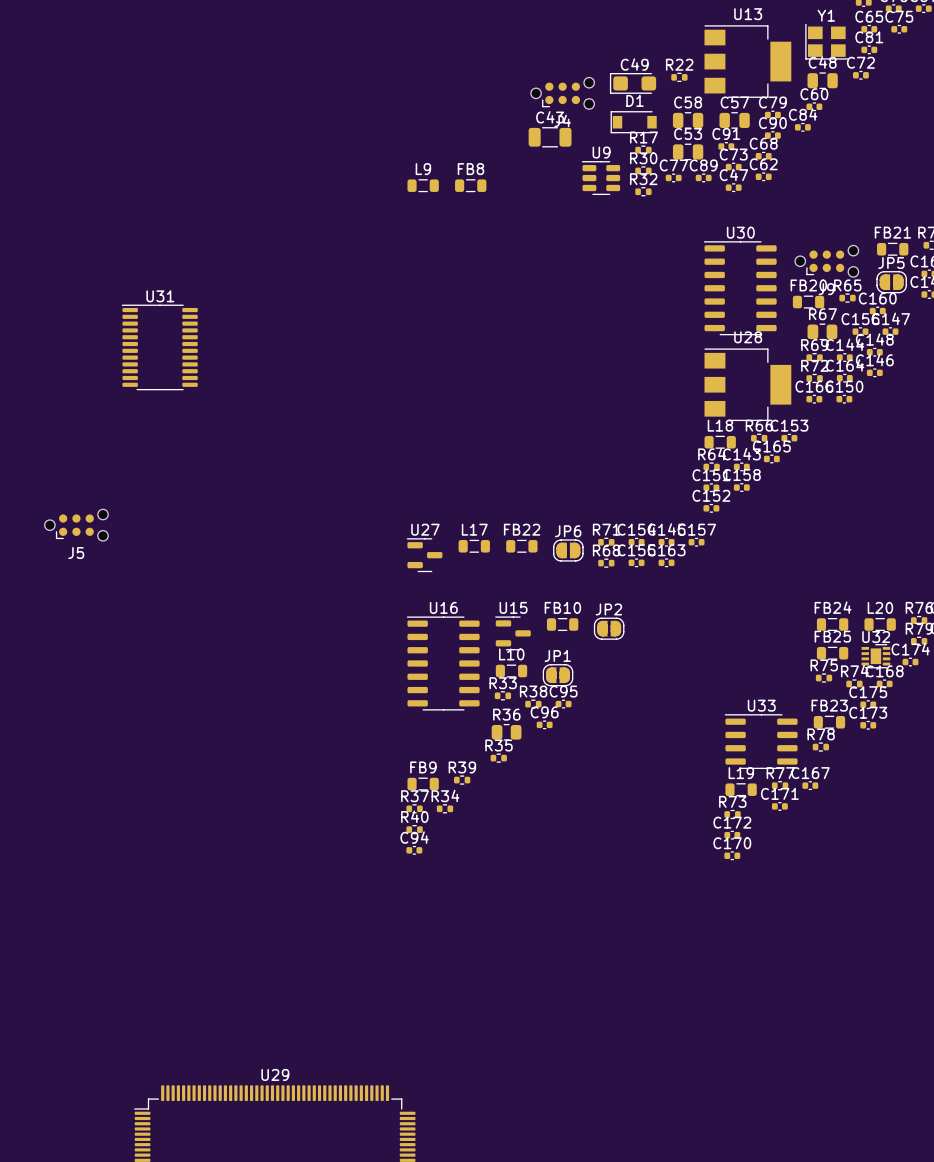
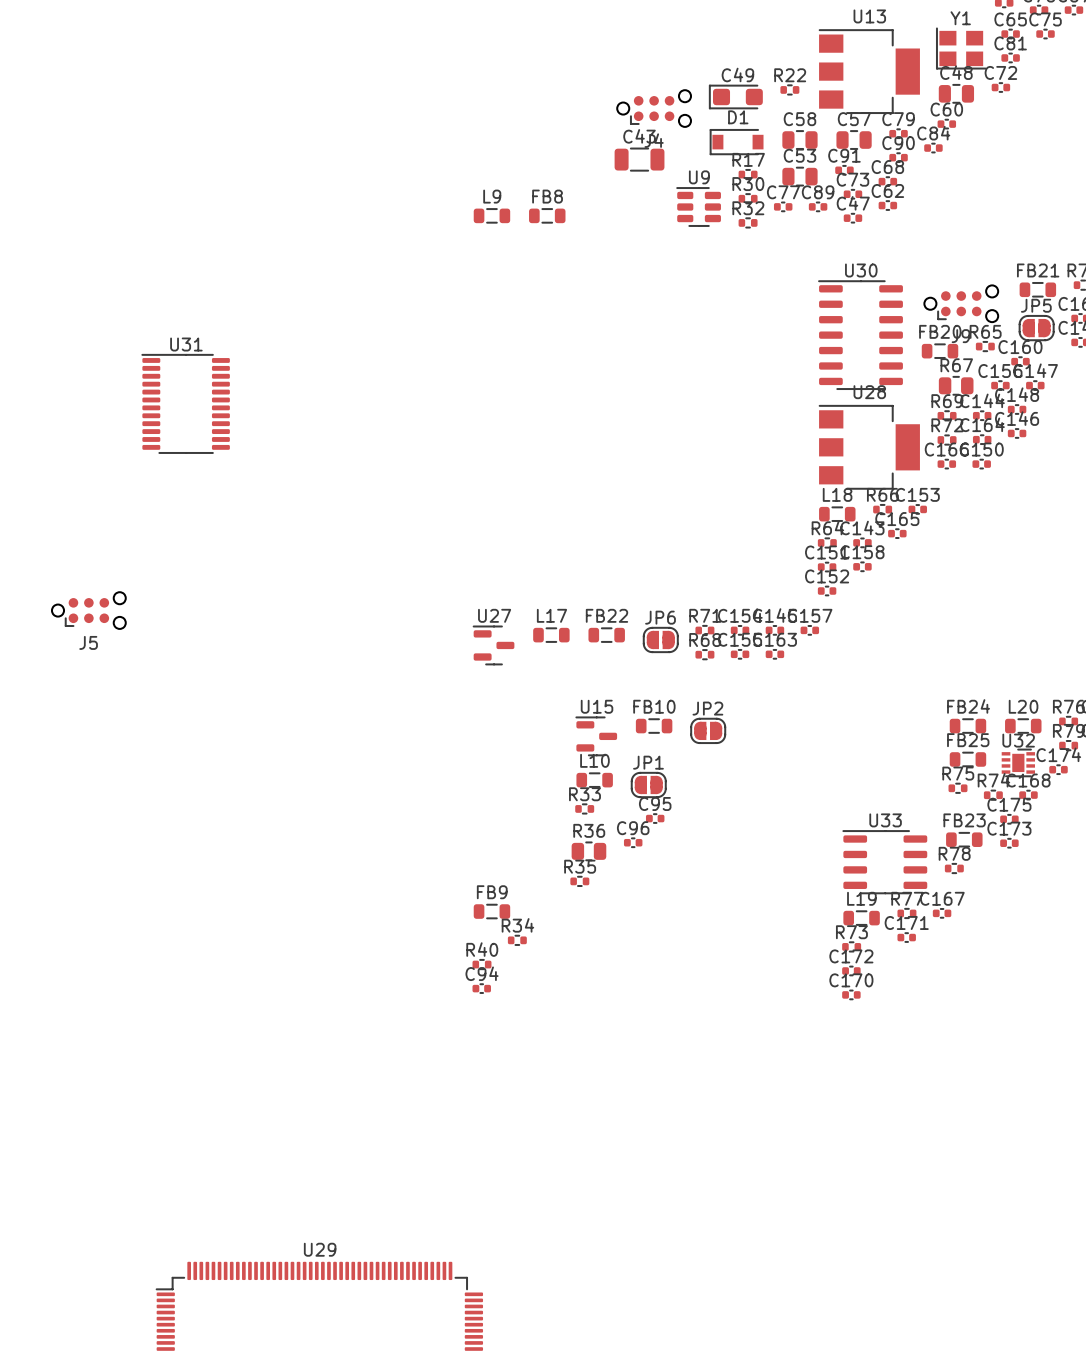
U16: (443, 663) -> none
R38: (533, 704) -> none
R39: (462, 780) -> none
R37: (414, 808) -> none

